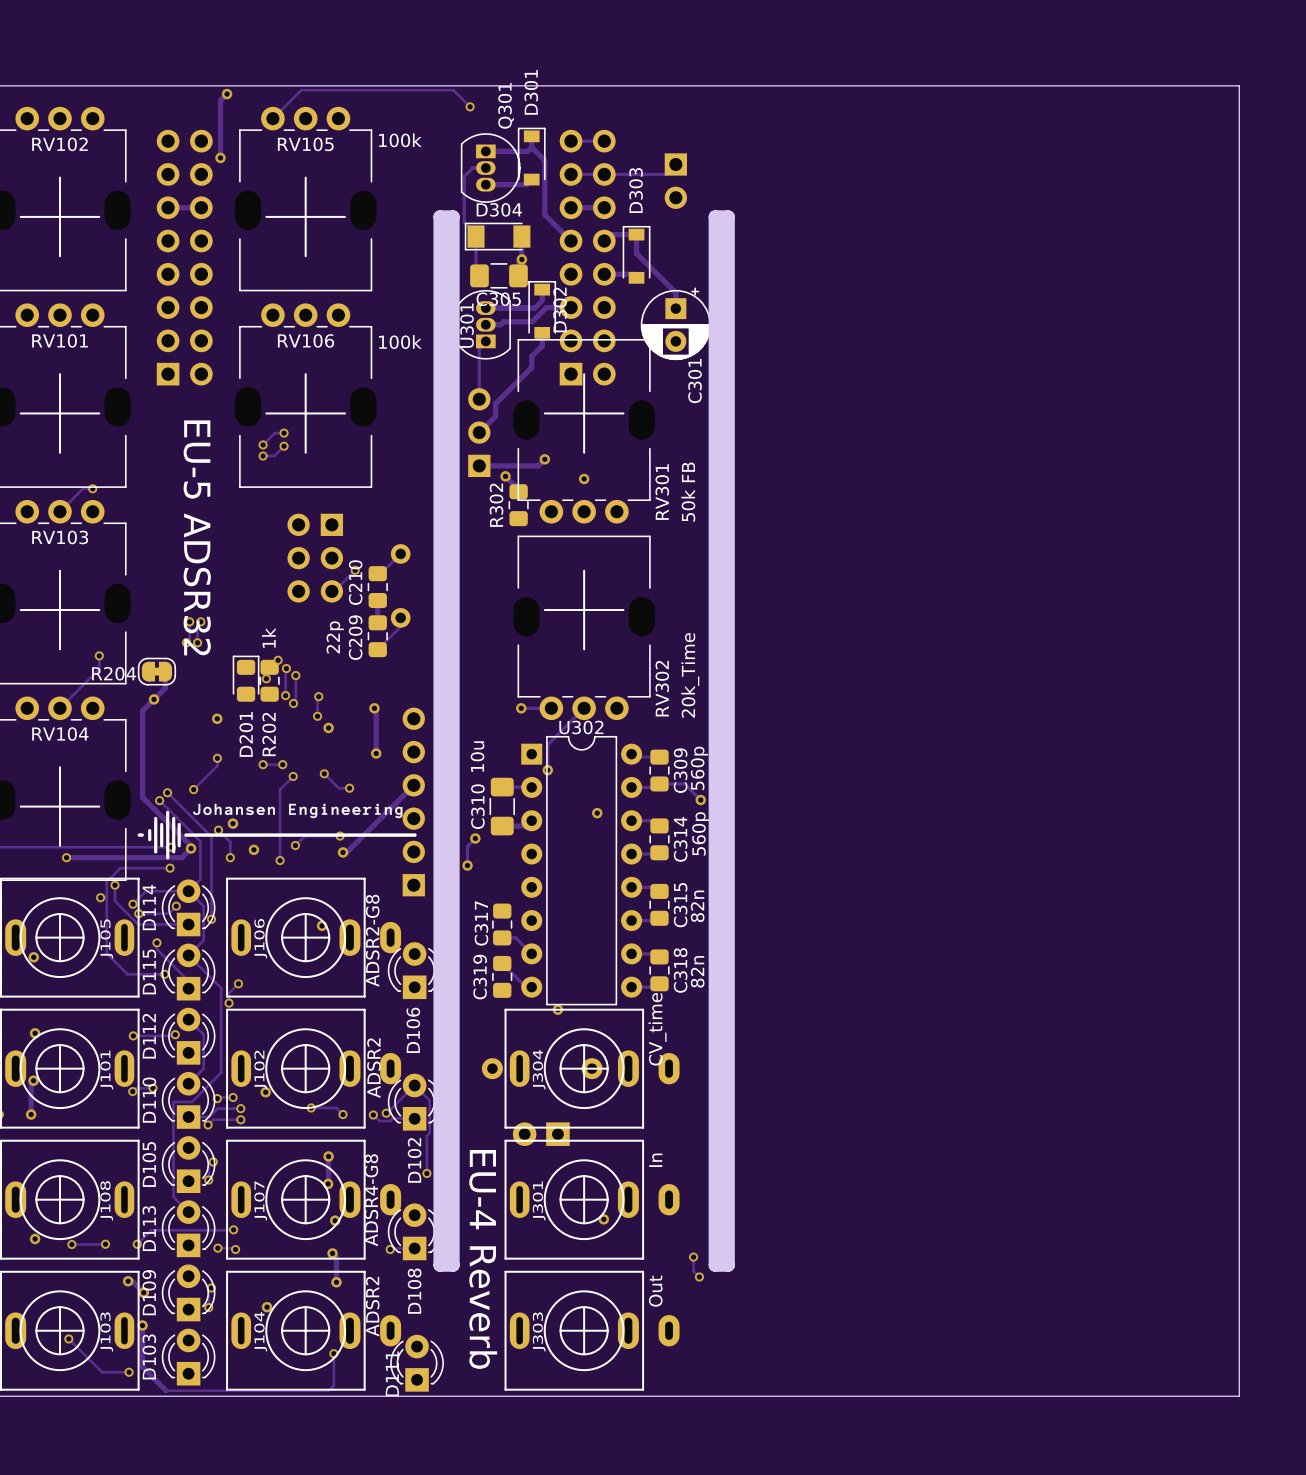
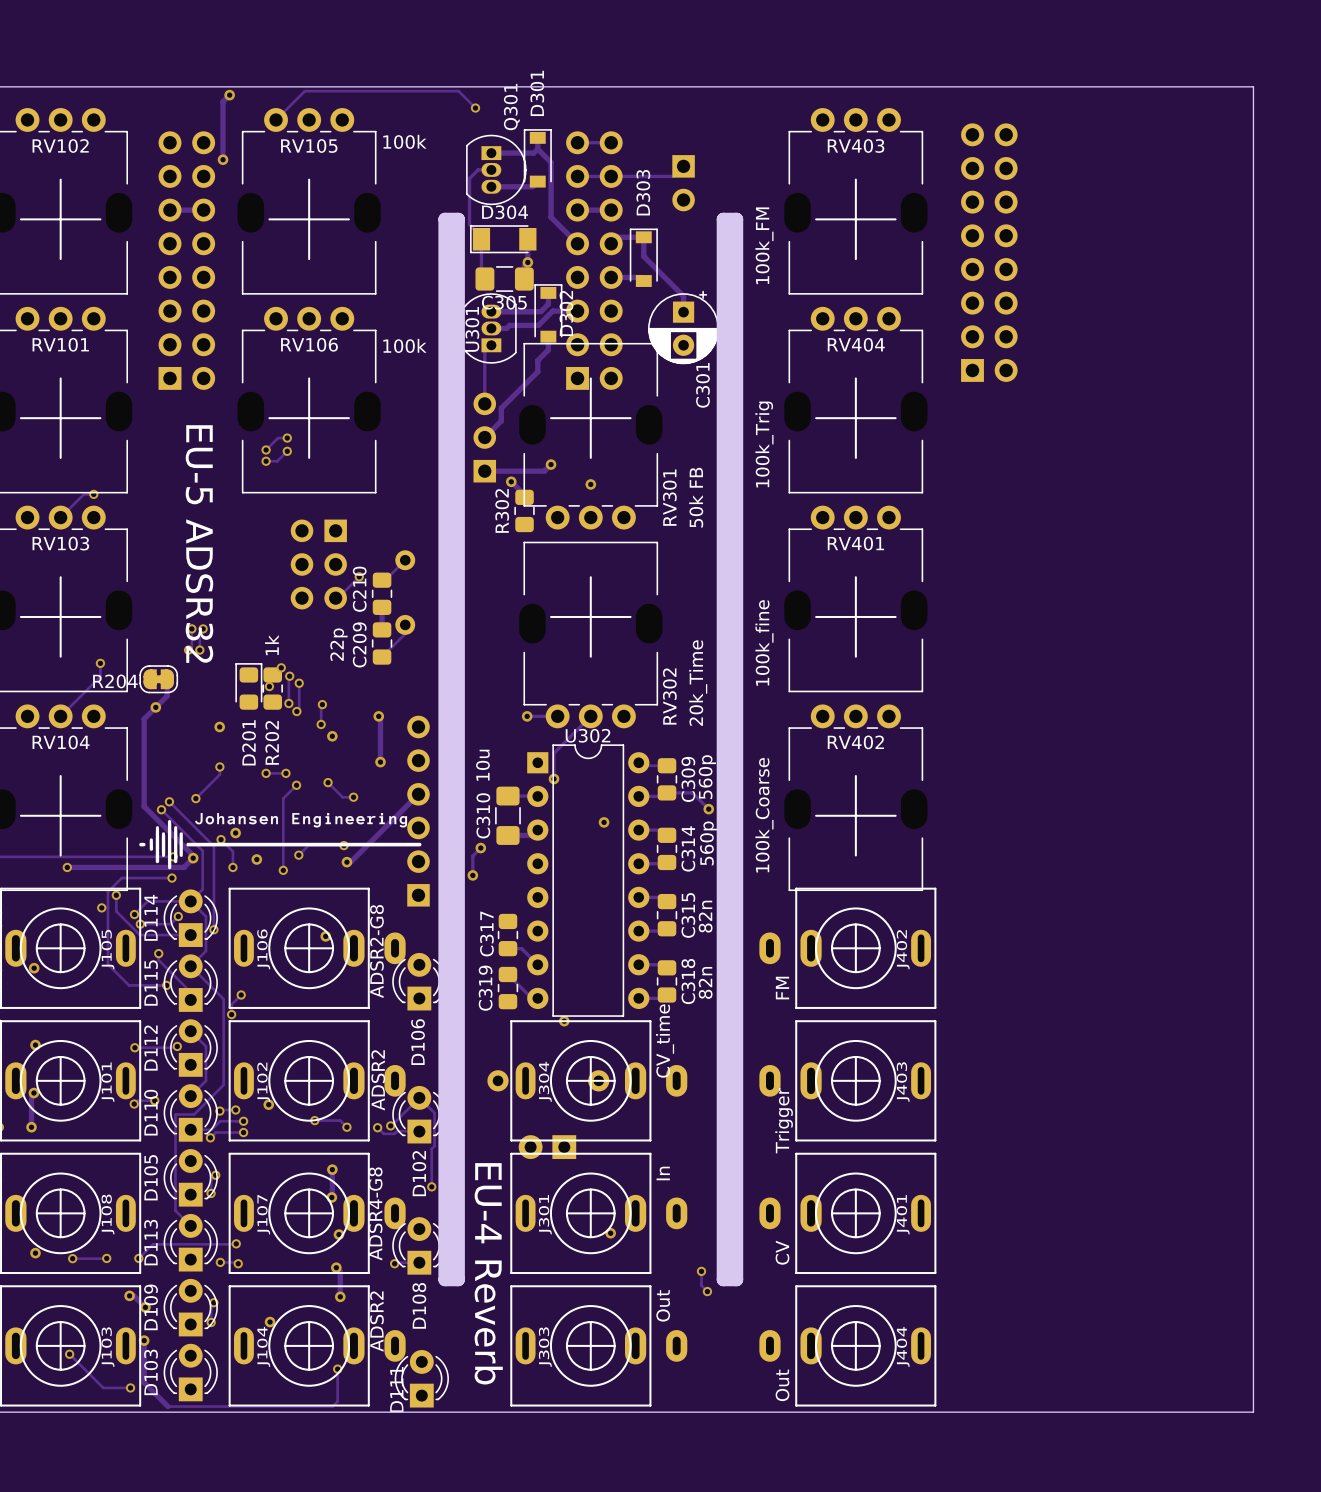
RV403: none -> 100k_FM (855, 201)
part: none -> (989, 252)
RV404: none -> 100k_Trig (855, 400)
RV401: none -> 100k_fine (855, 598)
RV402: none -> 100k_Coarse (855, 797)
J402: none -> FM (847, 948)
J403: none -> Trigger (847, 1080)
J401: none -> CV (847, 1213)
J404: none -> Out (847, 1345)

